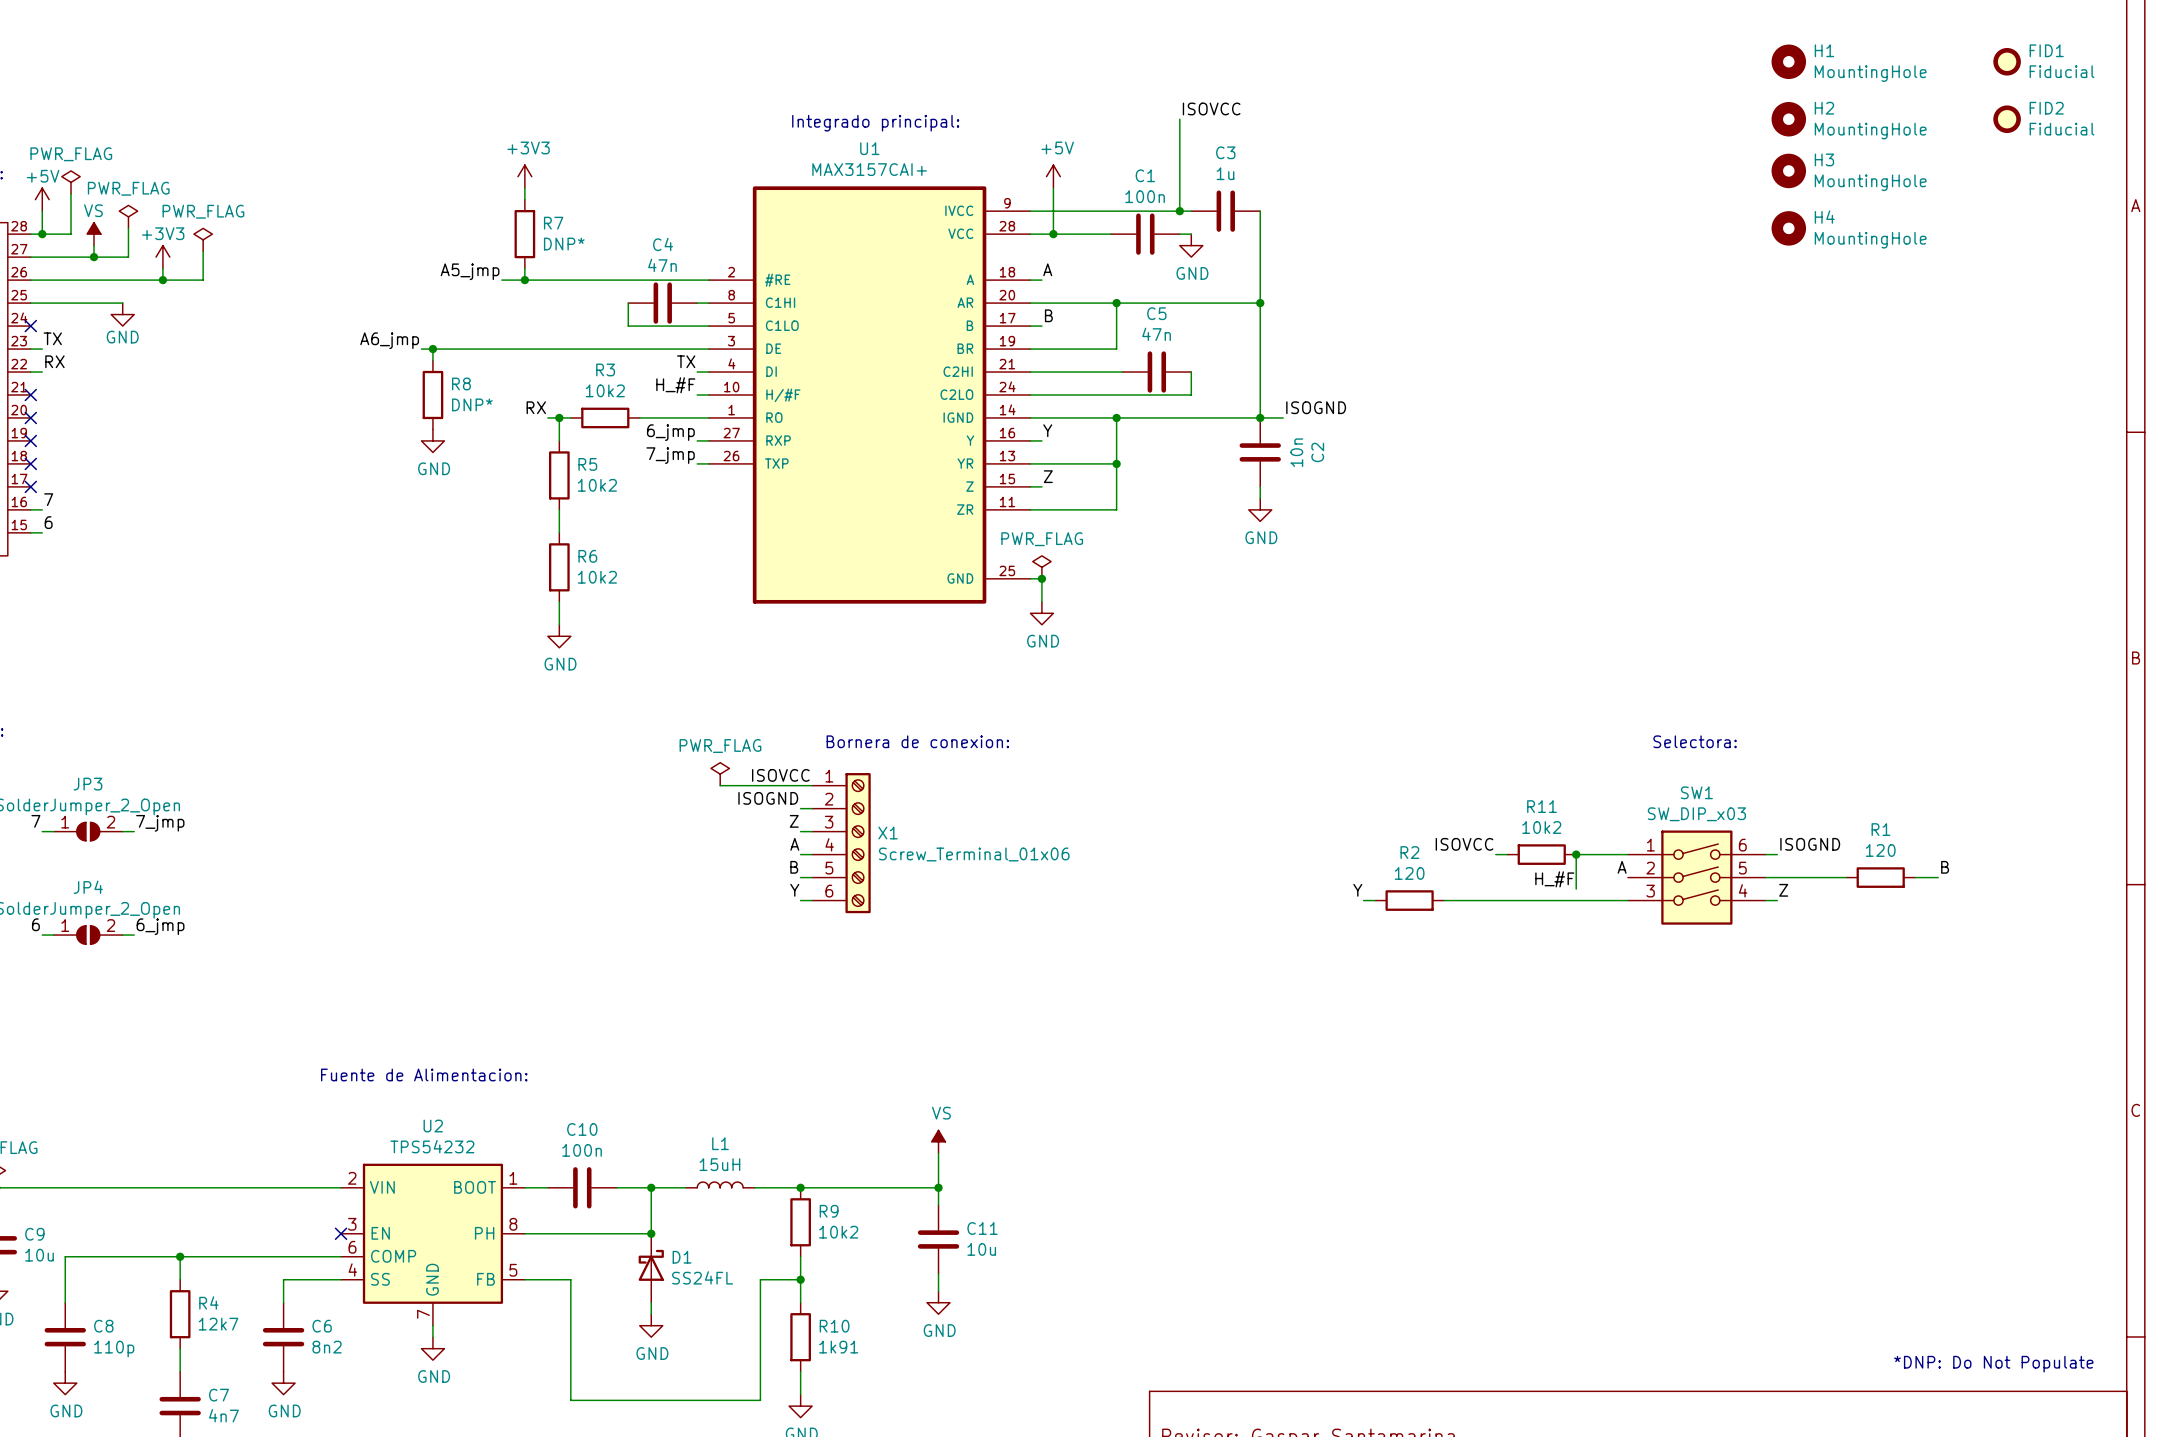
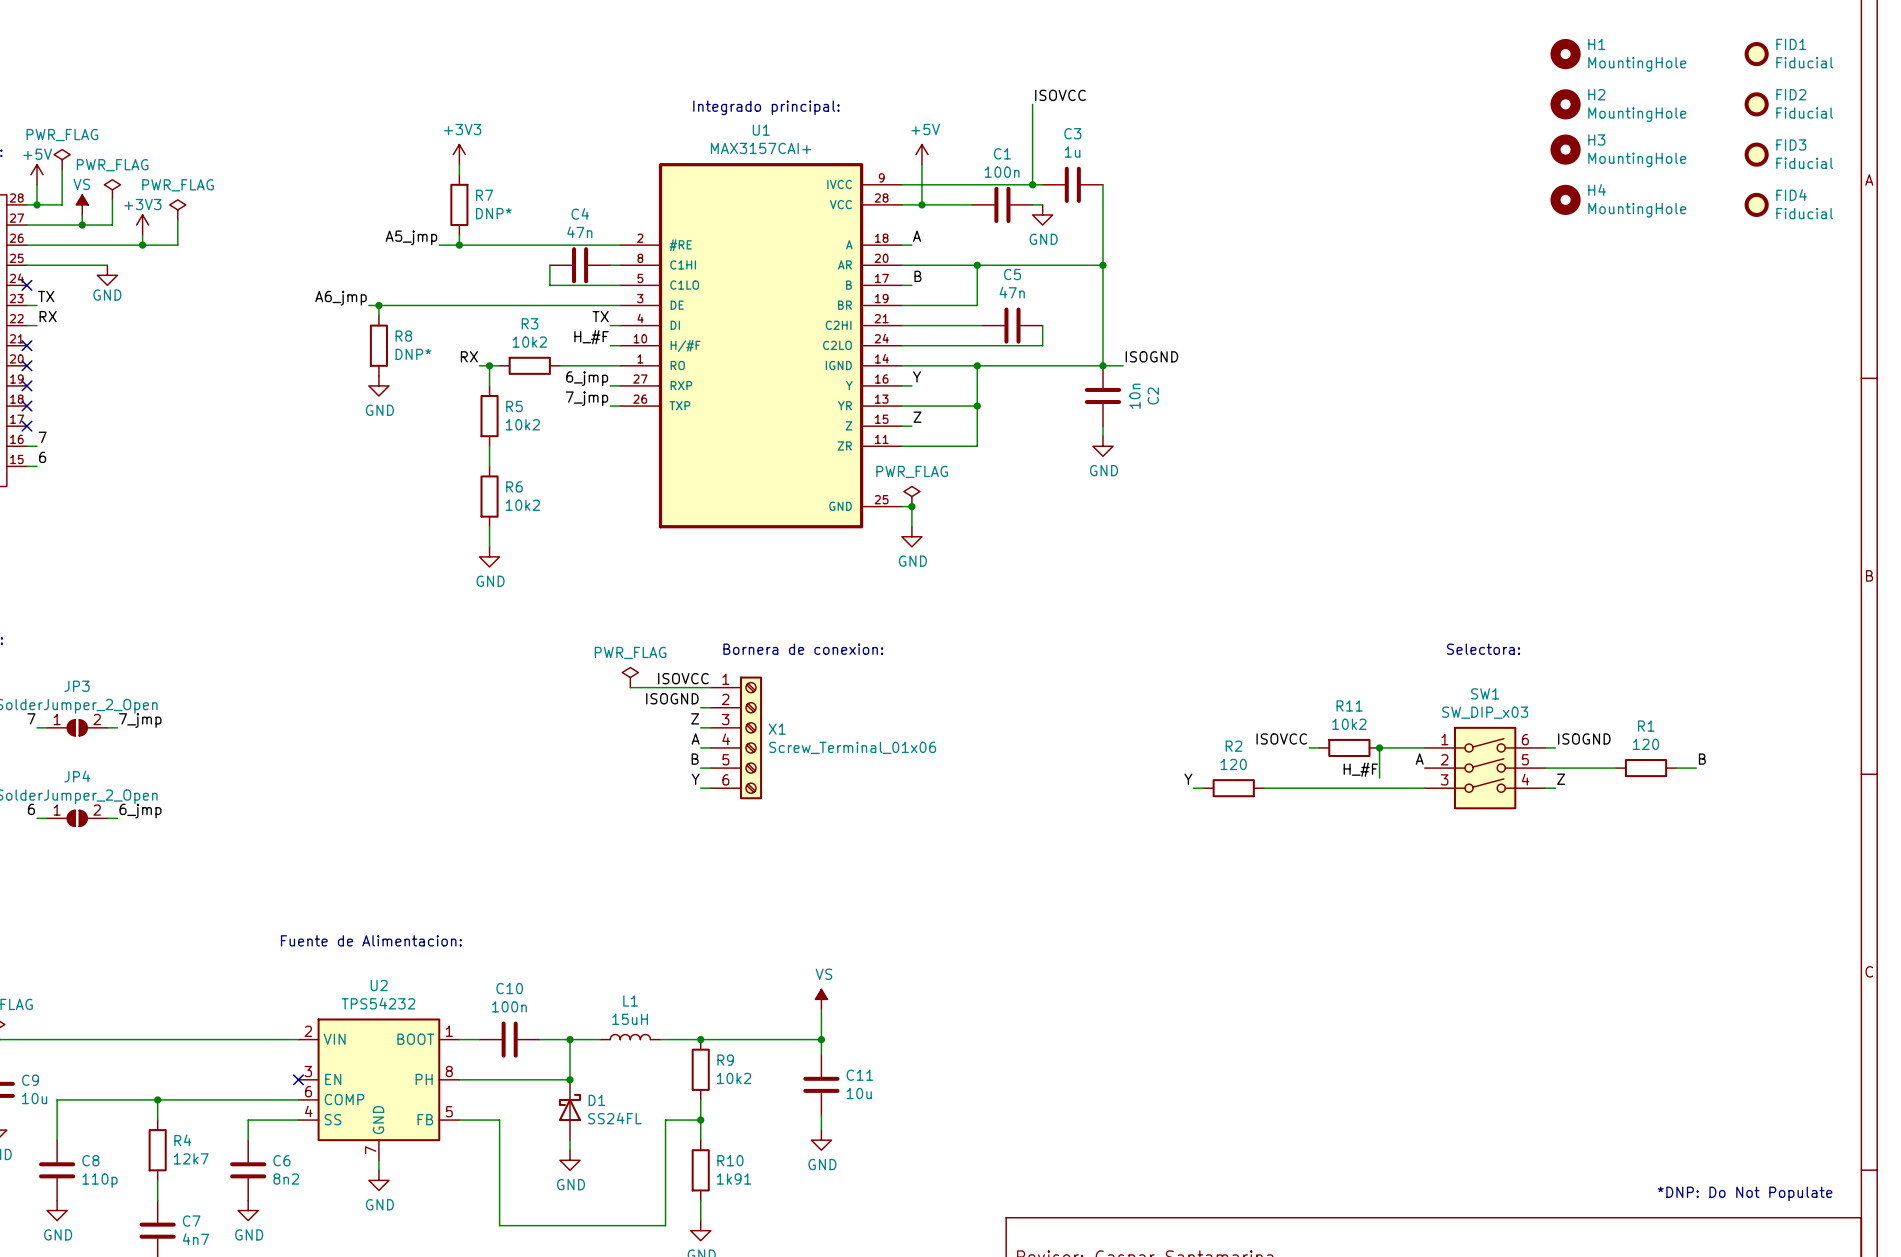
FID3: none -> Fiducial (1756, 154)
FID4: none -> Fiducial (1756, 204)

